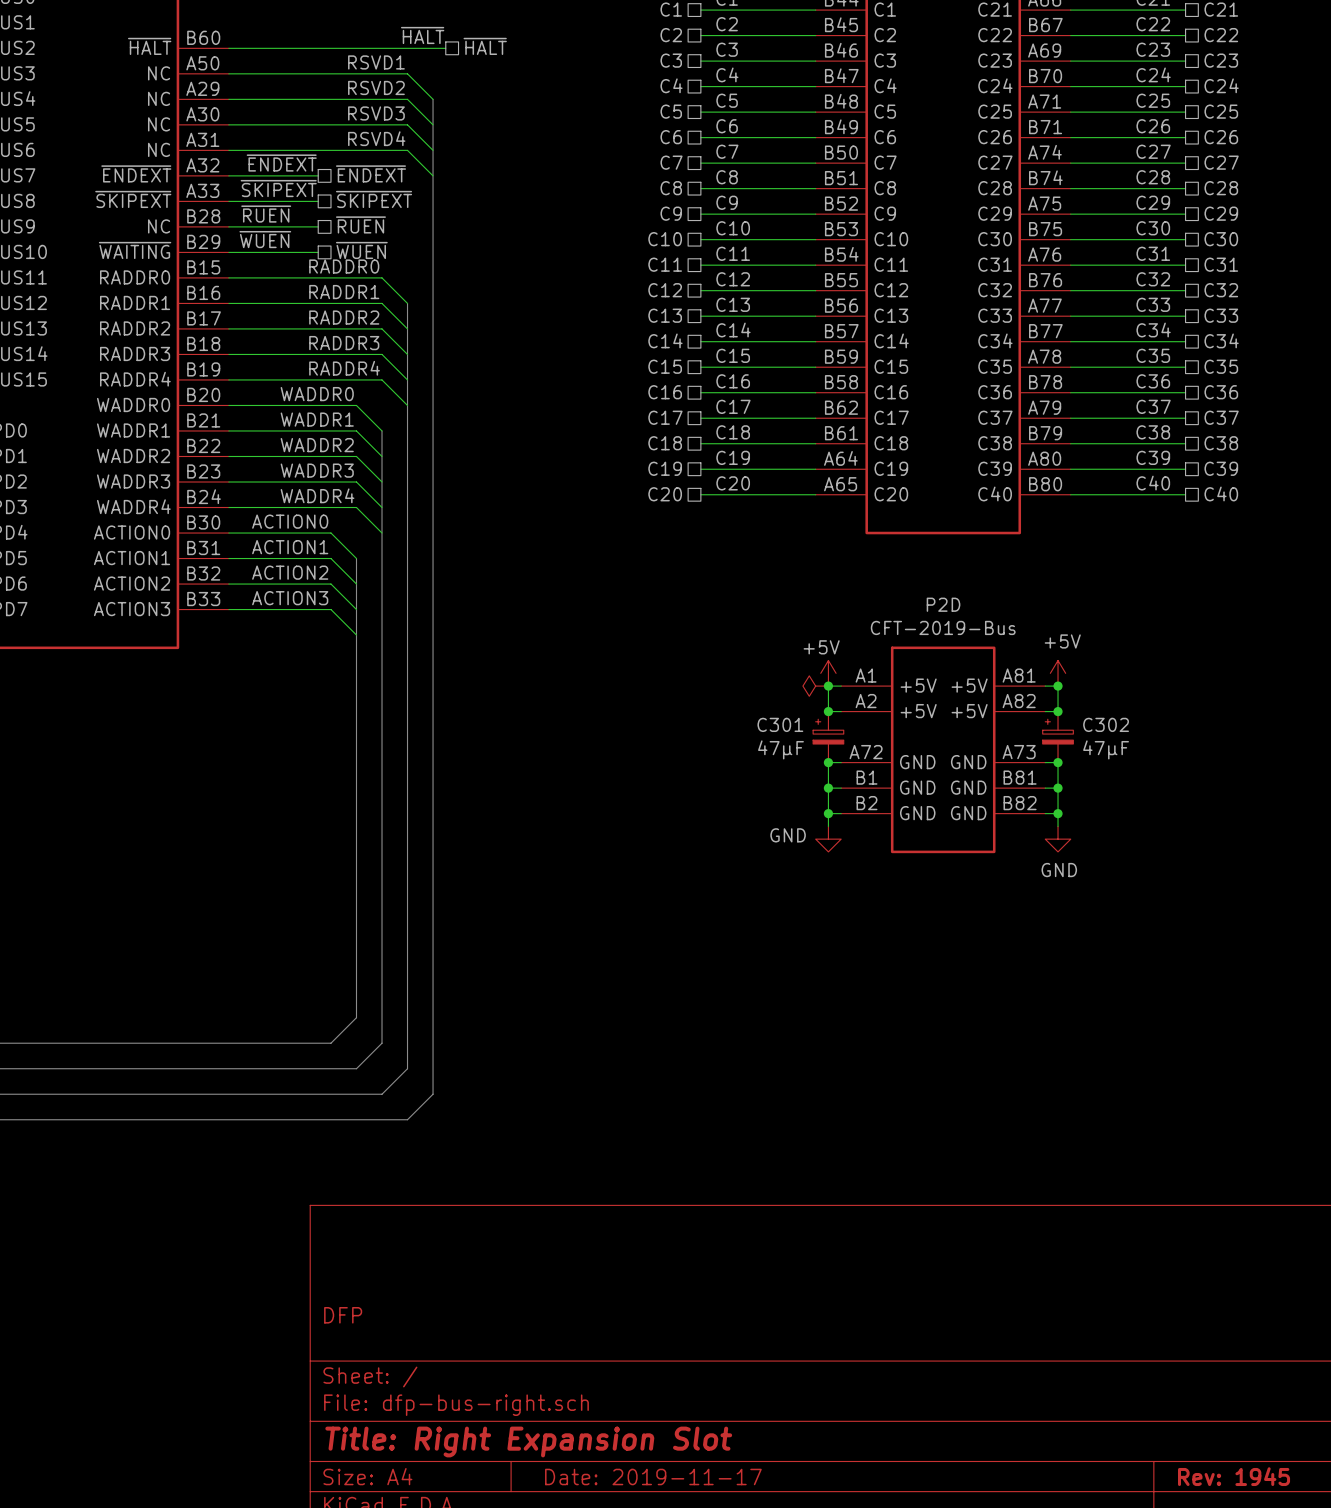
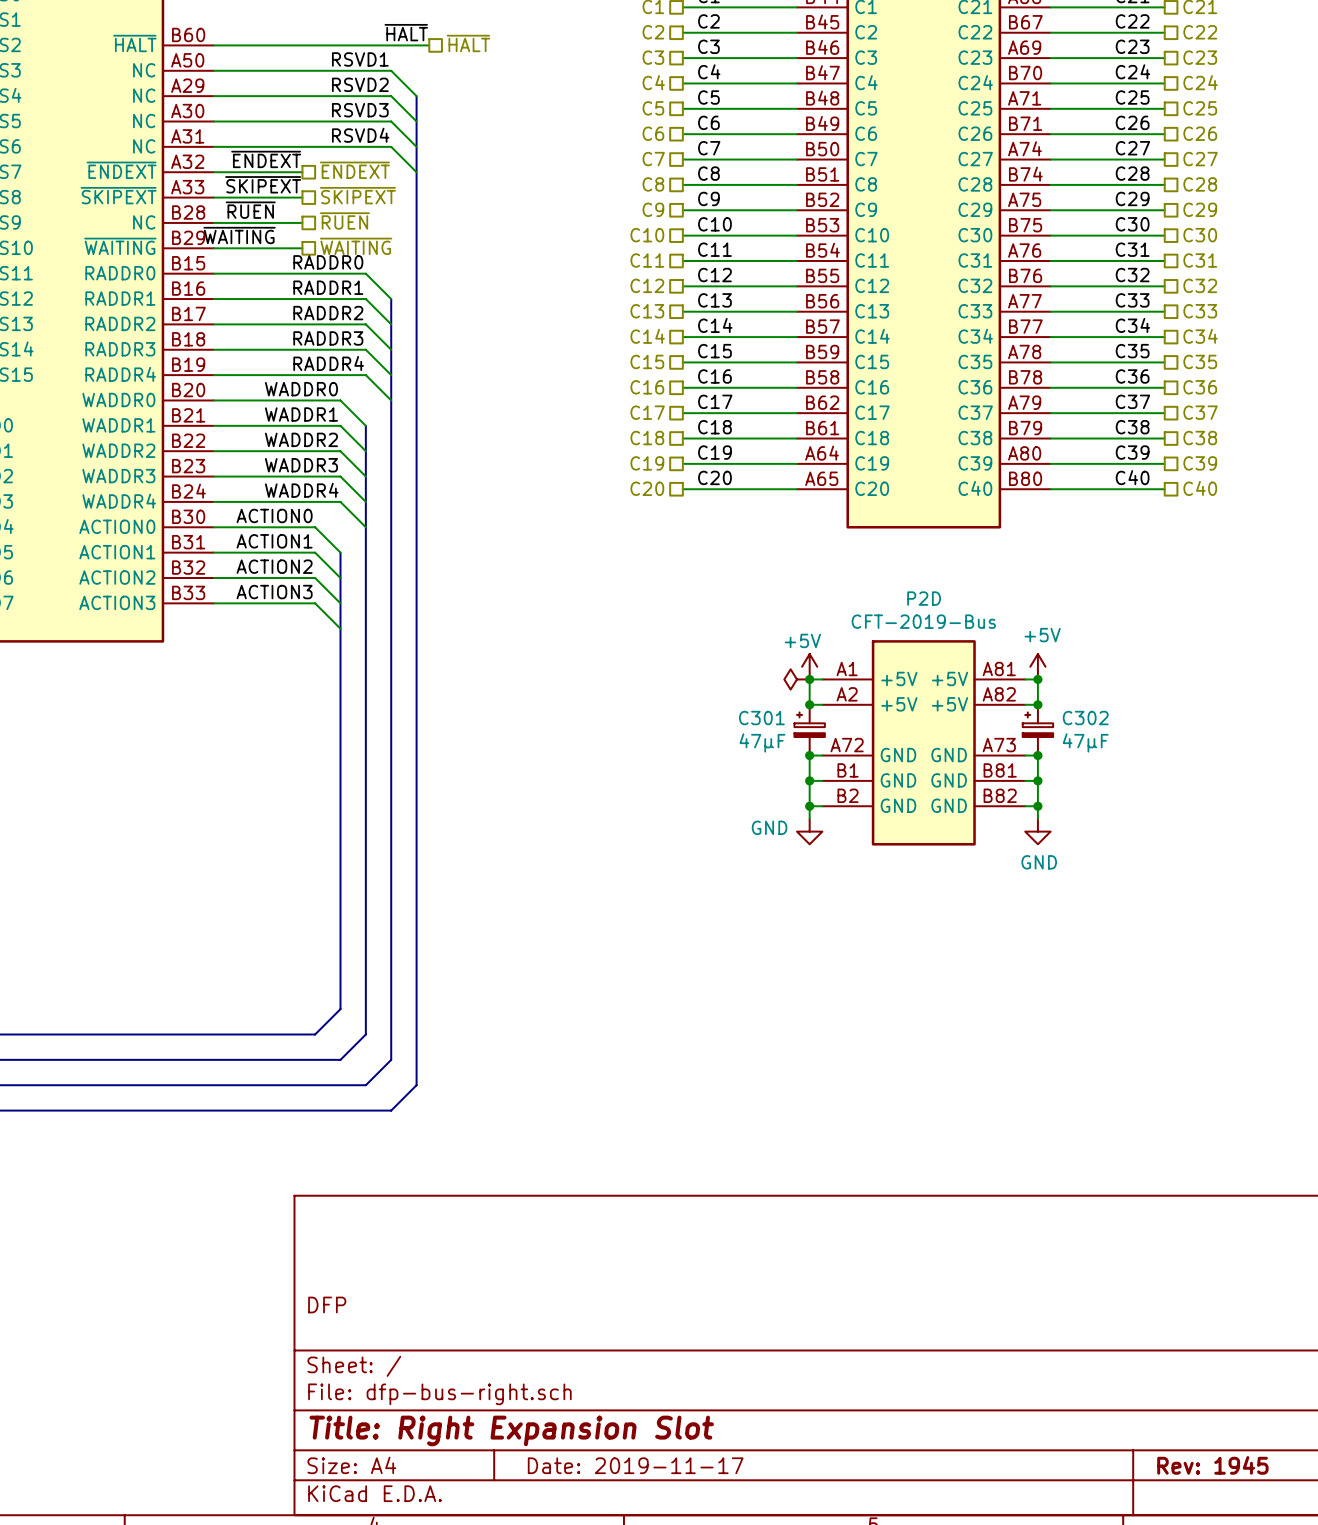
label: ~{WUEN} (265, 239) -> ~{WAITING} (239, 235)
hierarchical label: ~{WUEN} (361, 250) -> ~{WAITING} (356, 246)

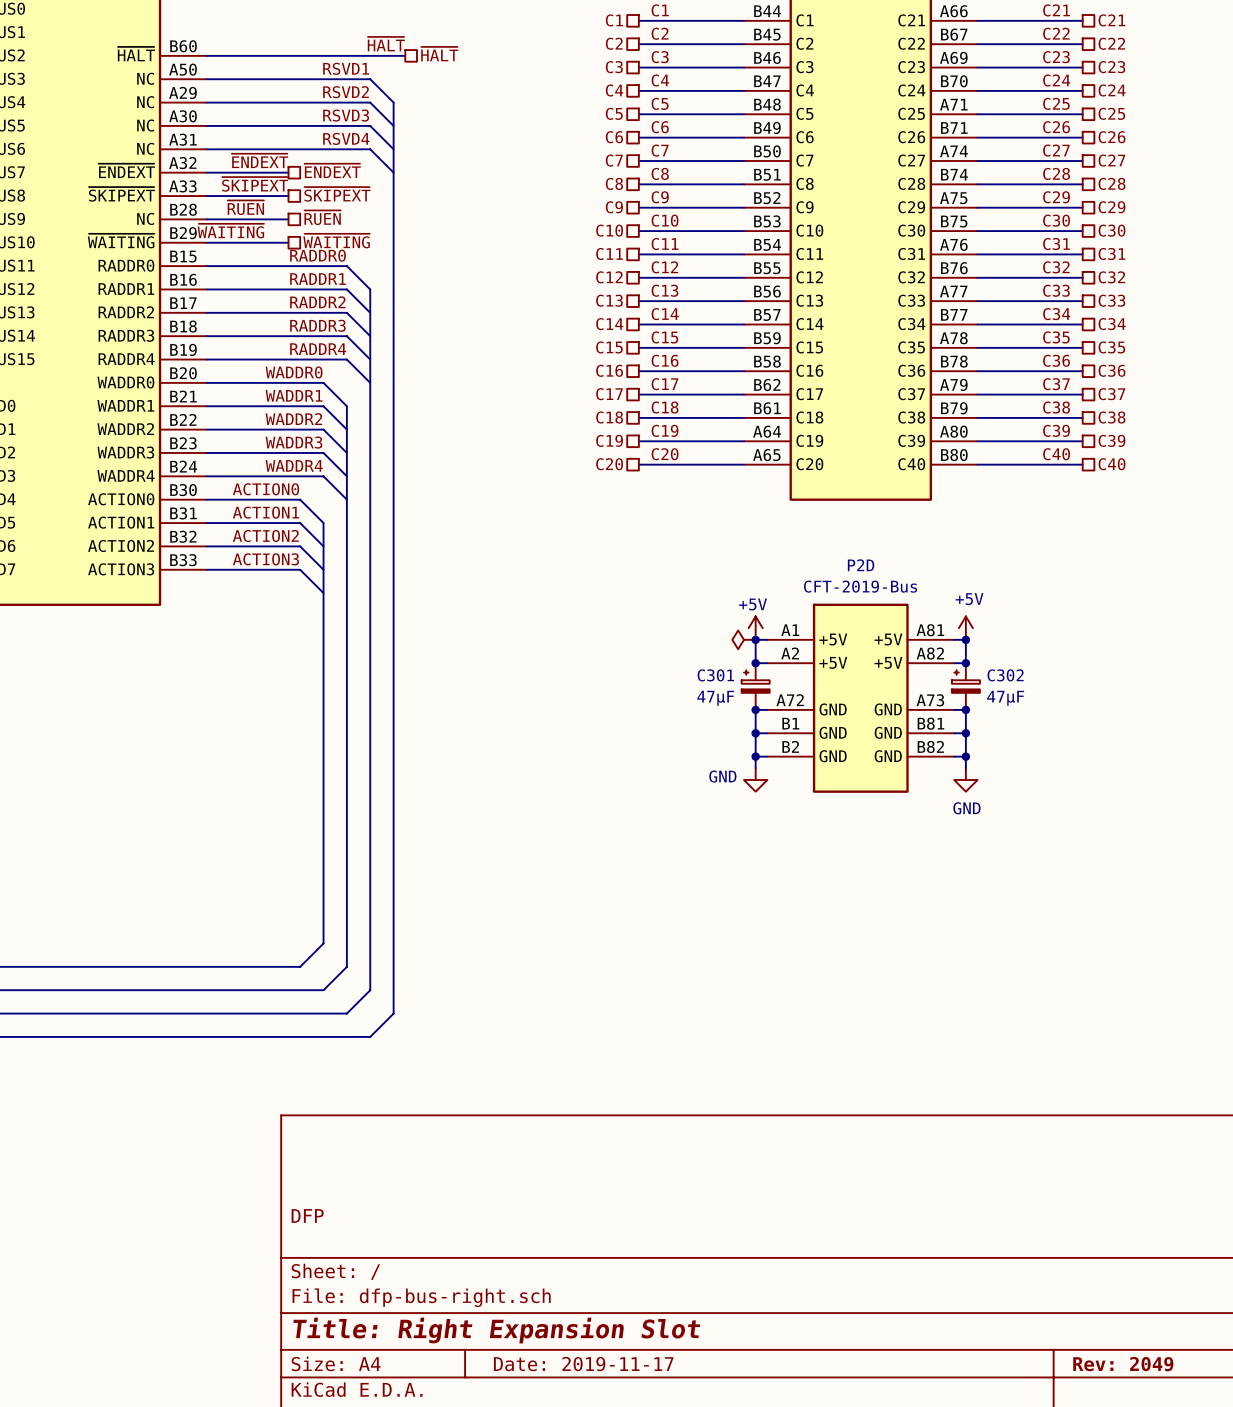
title block: Rev: 1945 (1212, 1465) -> Rev: 2049 (1123, 1364)

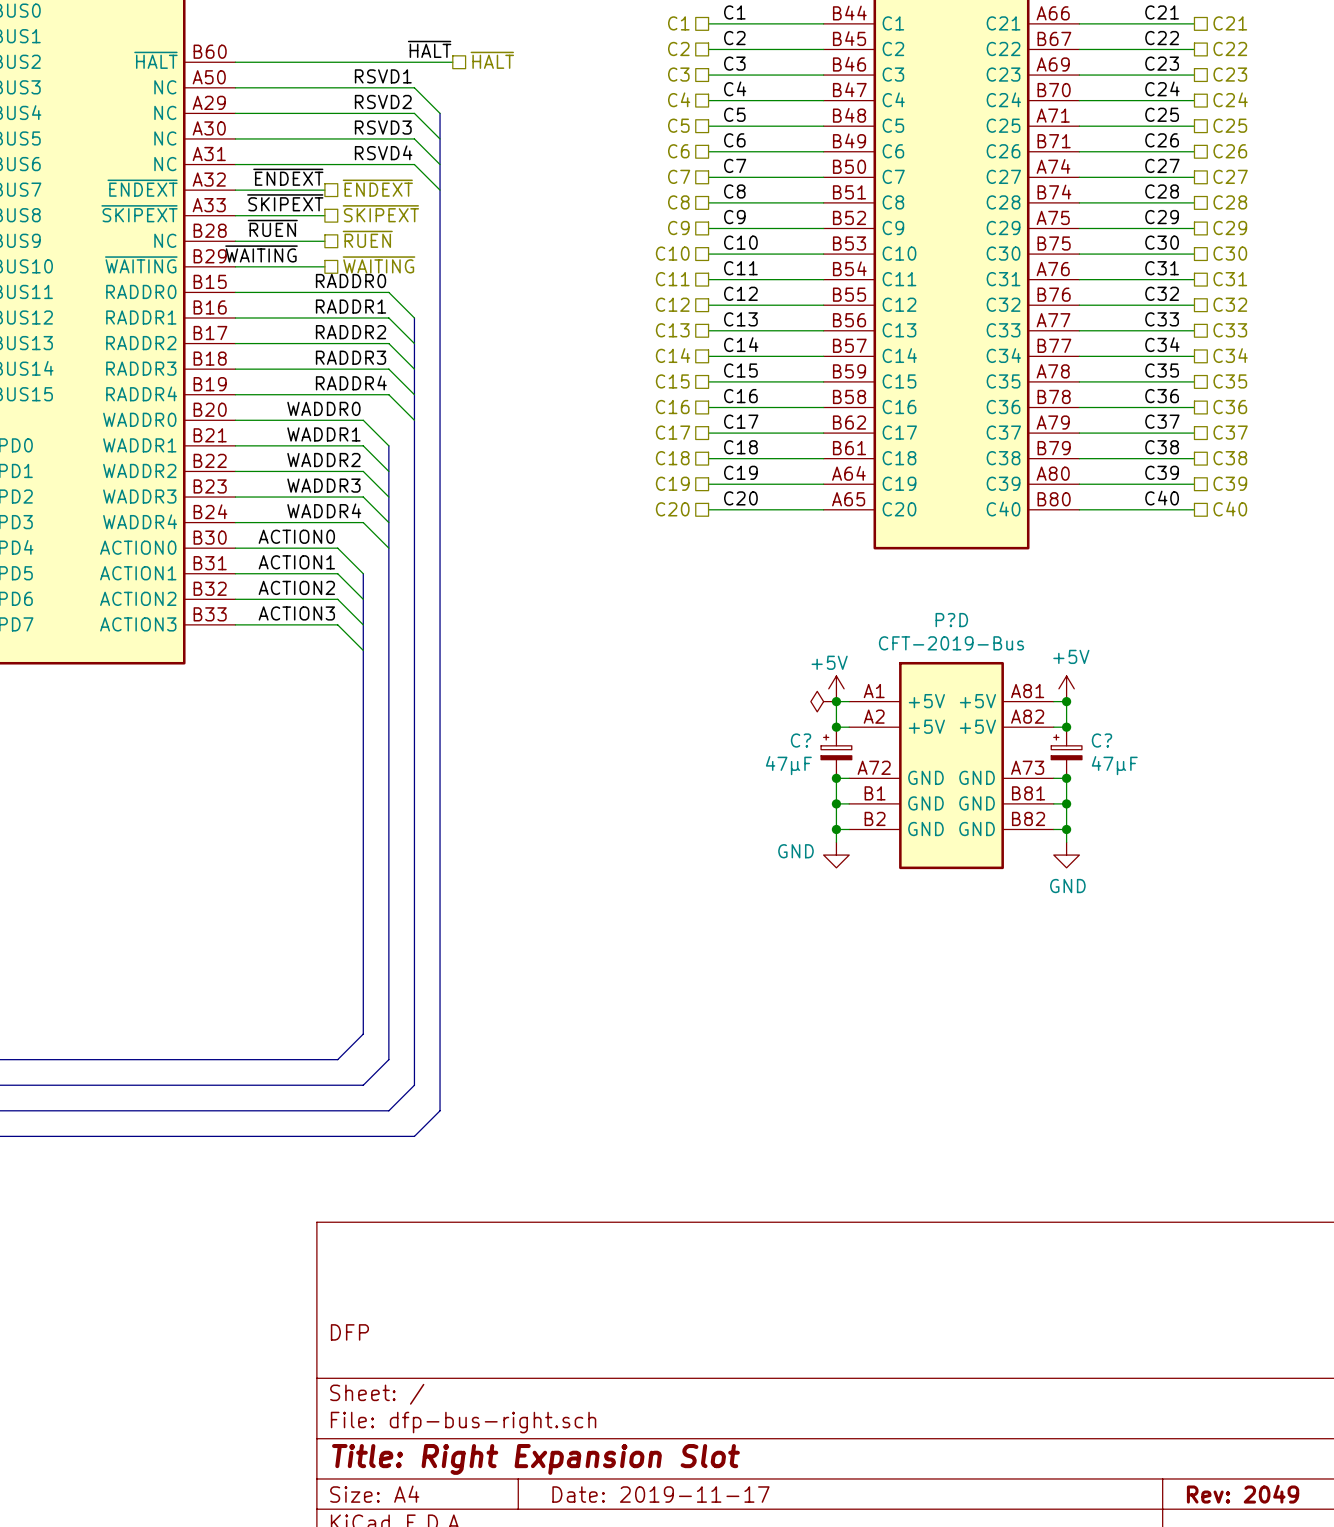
P2D name: P2D (861, 565) -> P?D (951, 620)
C301 name: C301 (715, 675) -> C? (801, 740)
C302 name: C302 (1005, 675) -> C? (1101, 740)

